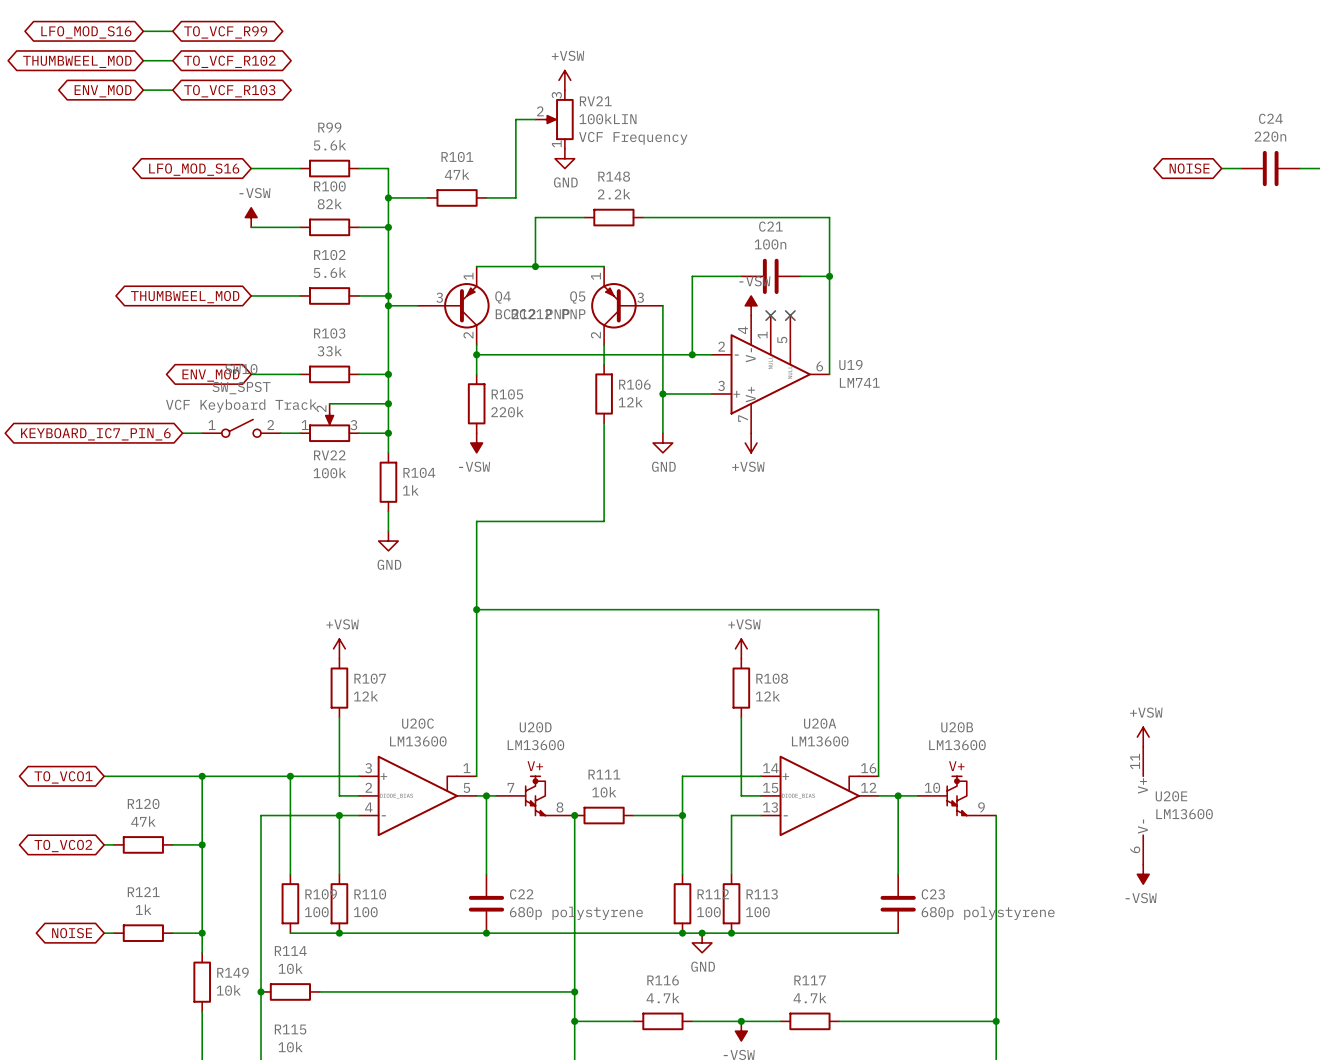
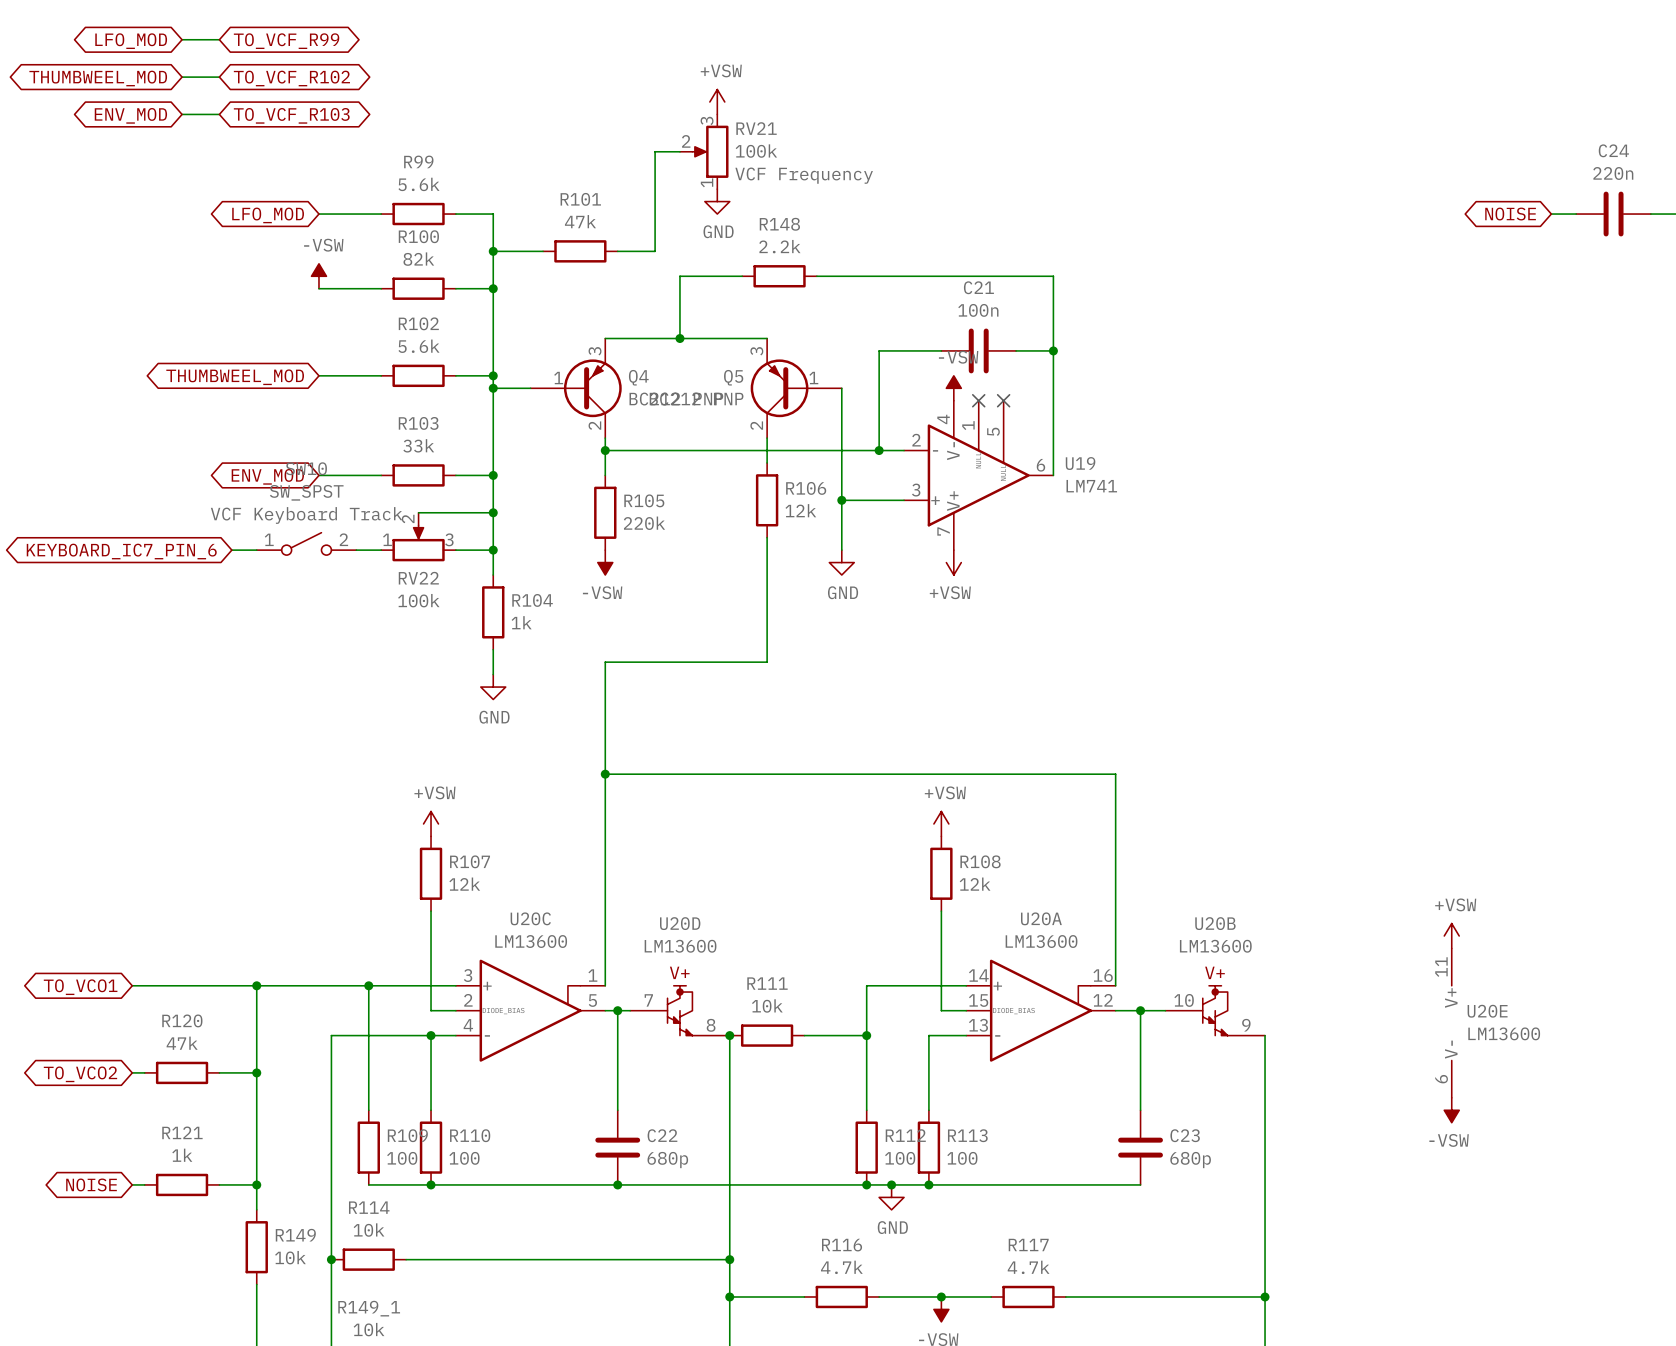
global label: LFO_MOD_S16 (86, 32) -> LFO_MOD (131, 41)
RV21 value: 100kLIN (607, 118) -> 100k (756, 151)
global label: LFO_MOD_S16 (194, 169) -> LFO_MOD (268, 215)
Q4 pin number: 1 (468, 276) -> 3 (595, 351)
Q5 pin number: 1 (596, 276) -> 3 (756, 351)
Q4 pin number: 3 (439, 297) -> 1 (558, 378)
Q5 pin number: 3 (640, 297) -> 1 (813, 378)
C22 value: 680p polystyrene (576, 913) -> 680p (667, 1160)
C23 value: 680p polystyrene (988, 913) -> 680p (1190, 1160)
R115 name: R115 (290, 1029) -> R149_1 (369, 1308)

